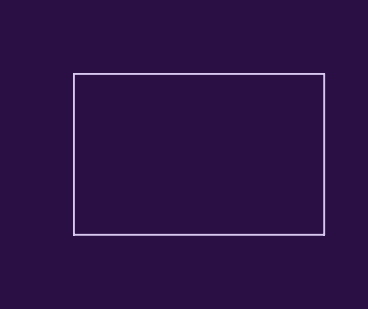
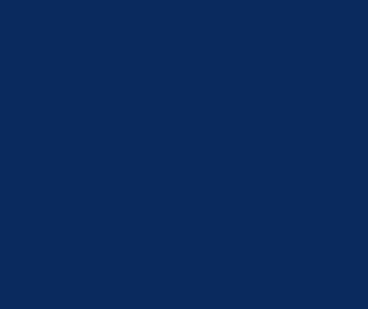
part: (199, 154) -> none

